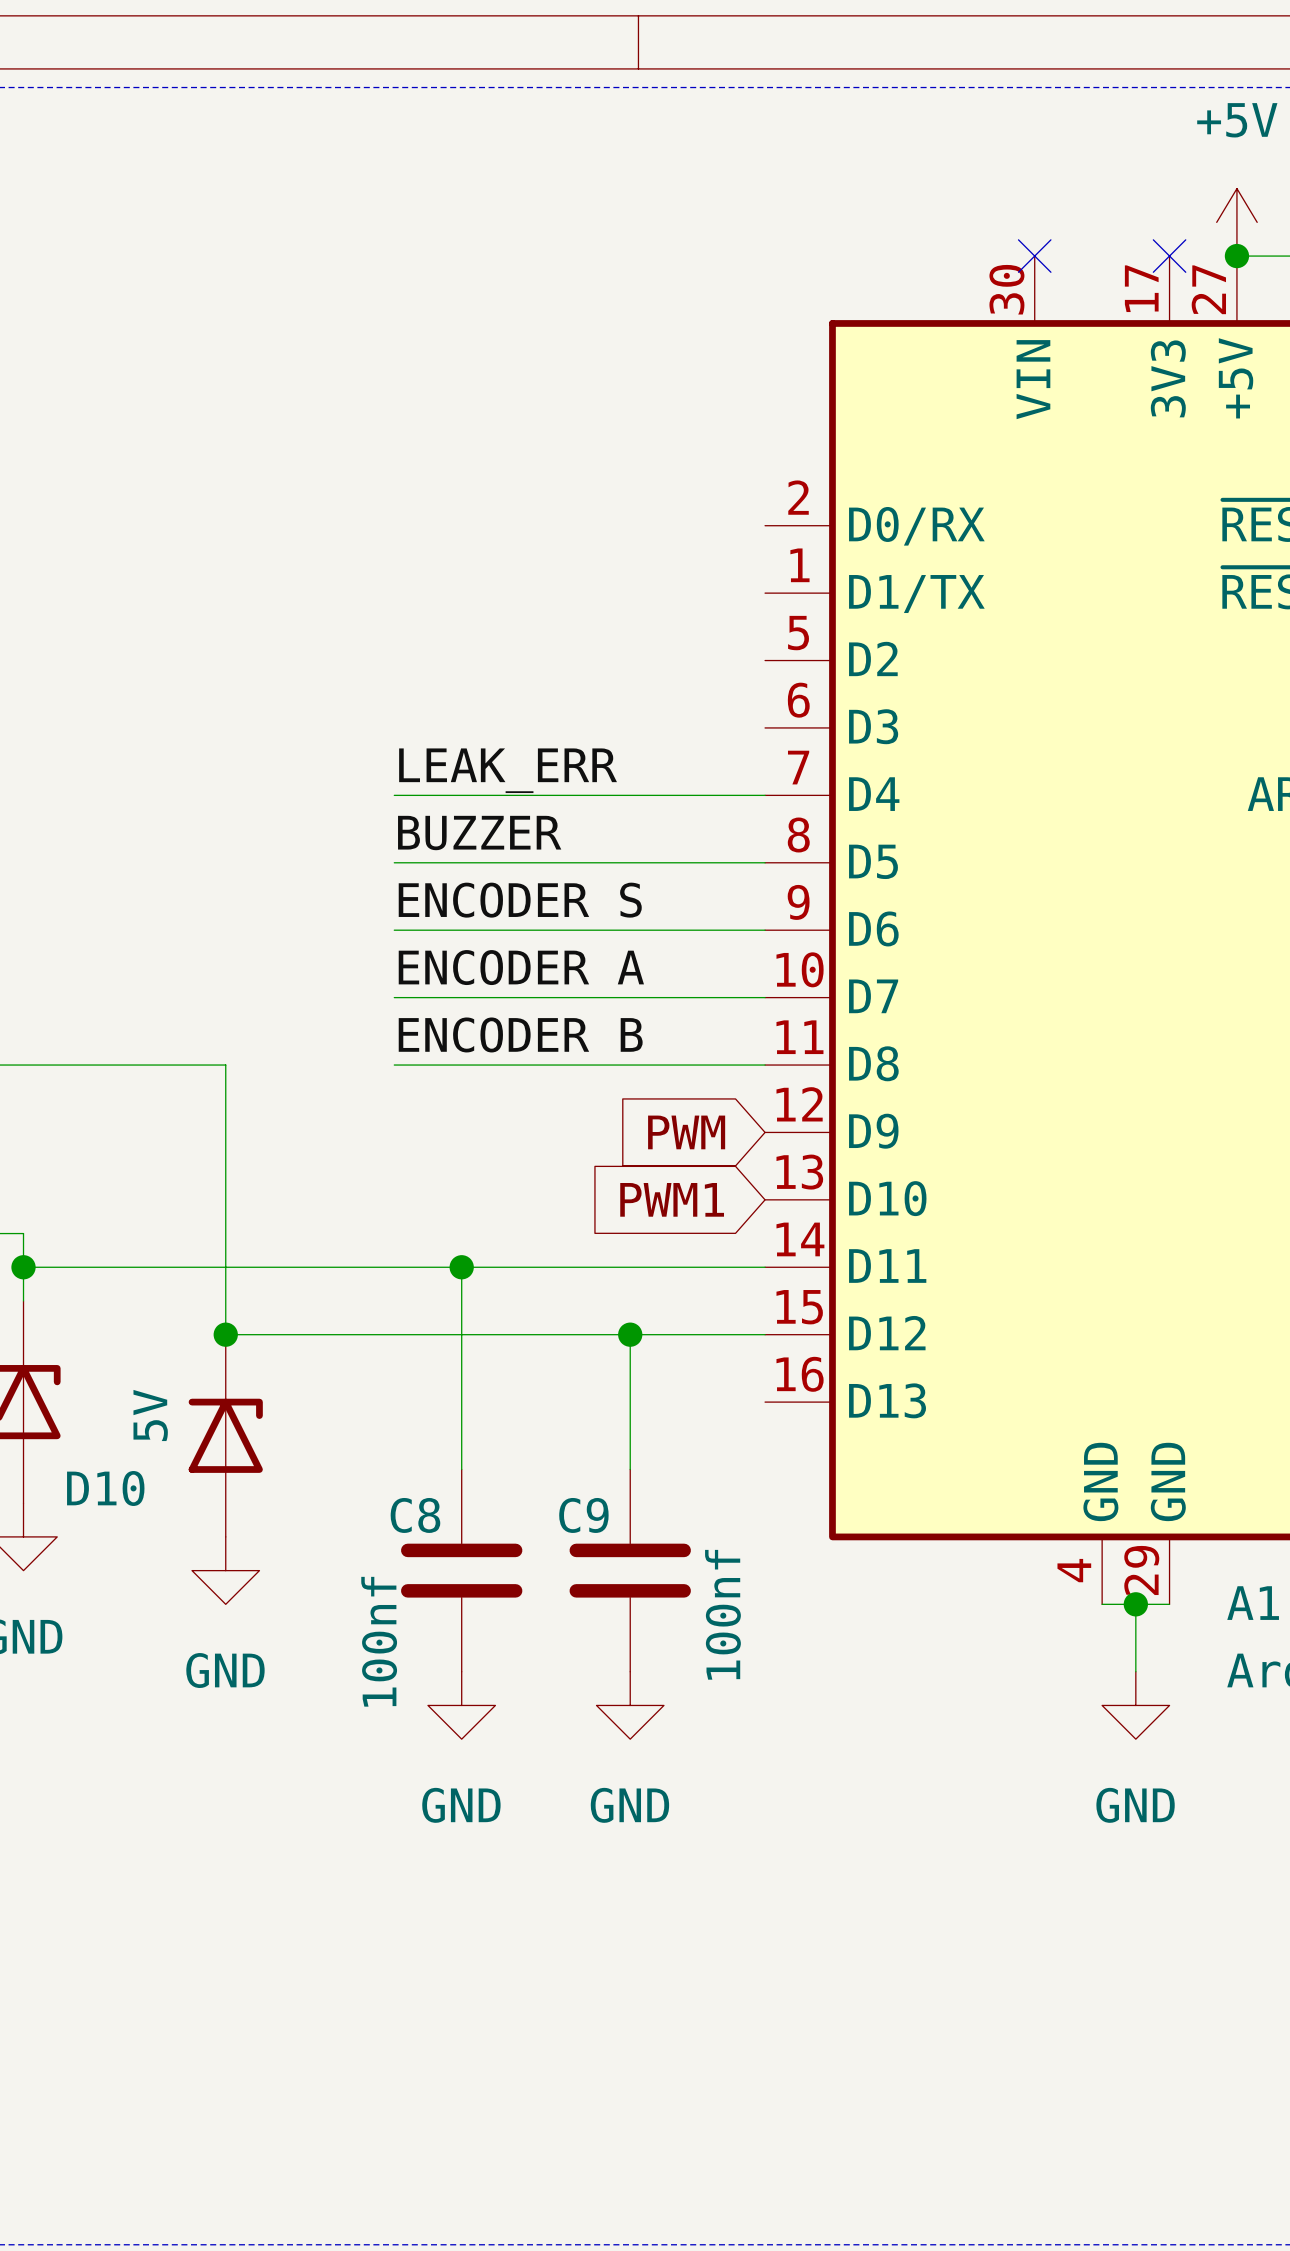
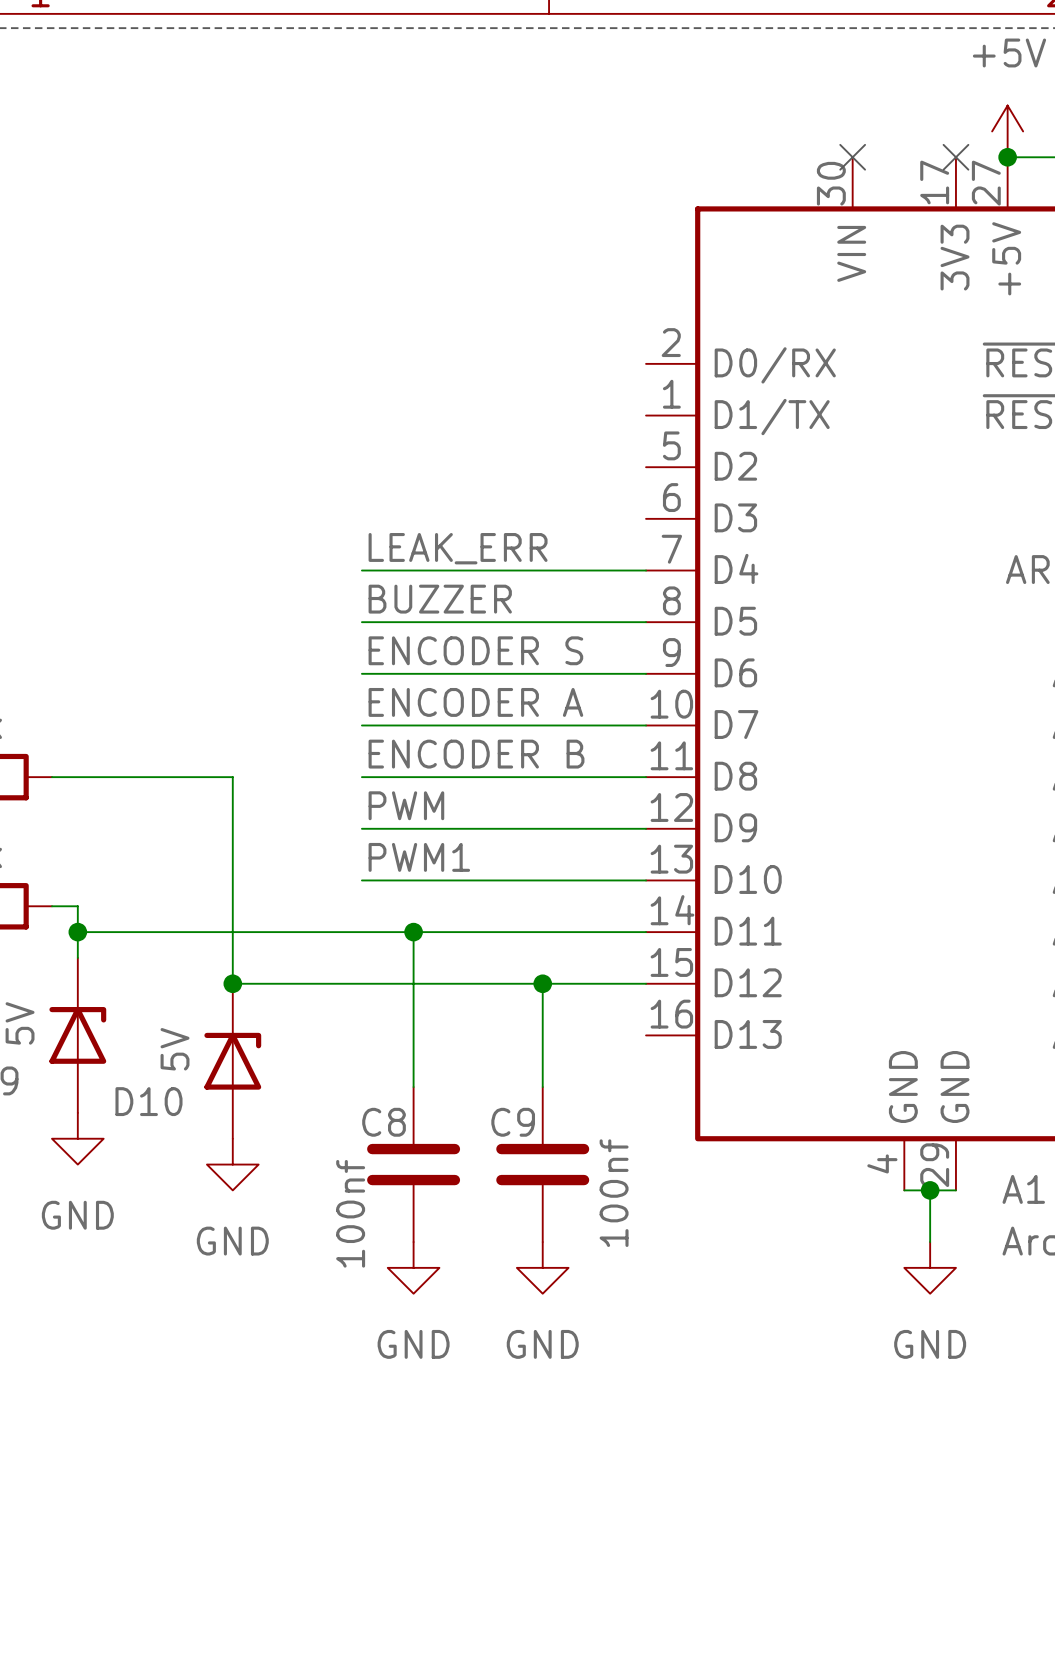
label: none -> PWM (406, 805)
wire: none -> (361, 828) (646, 828)
global label: PWM (686, 1132) -> none
label: none -> PWM1 (419, 857)
wire: none -> (361, 880) (646, 880)
global label: PWM1 (672, 1199) -> none

